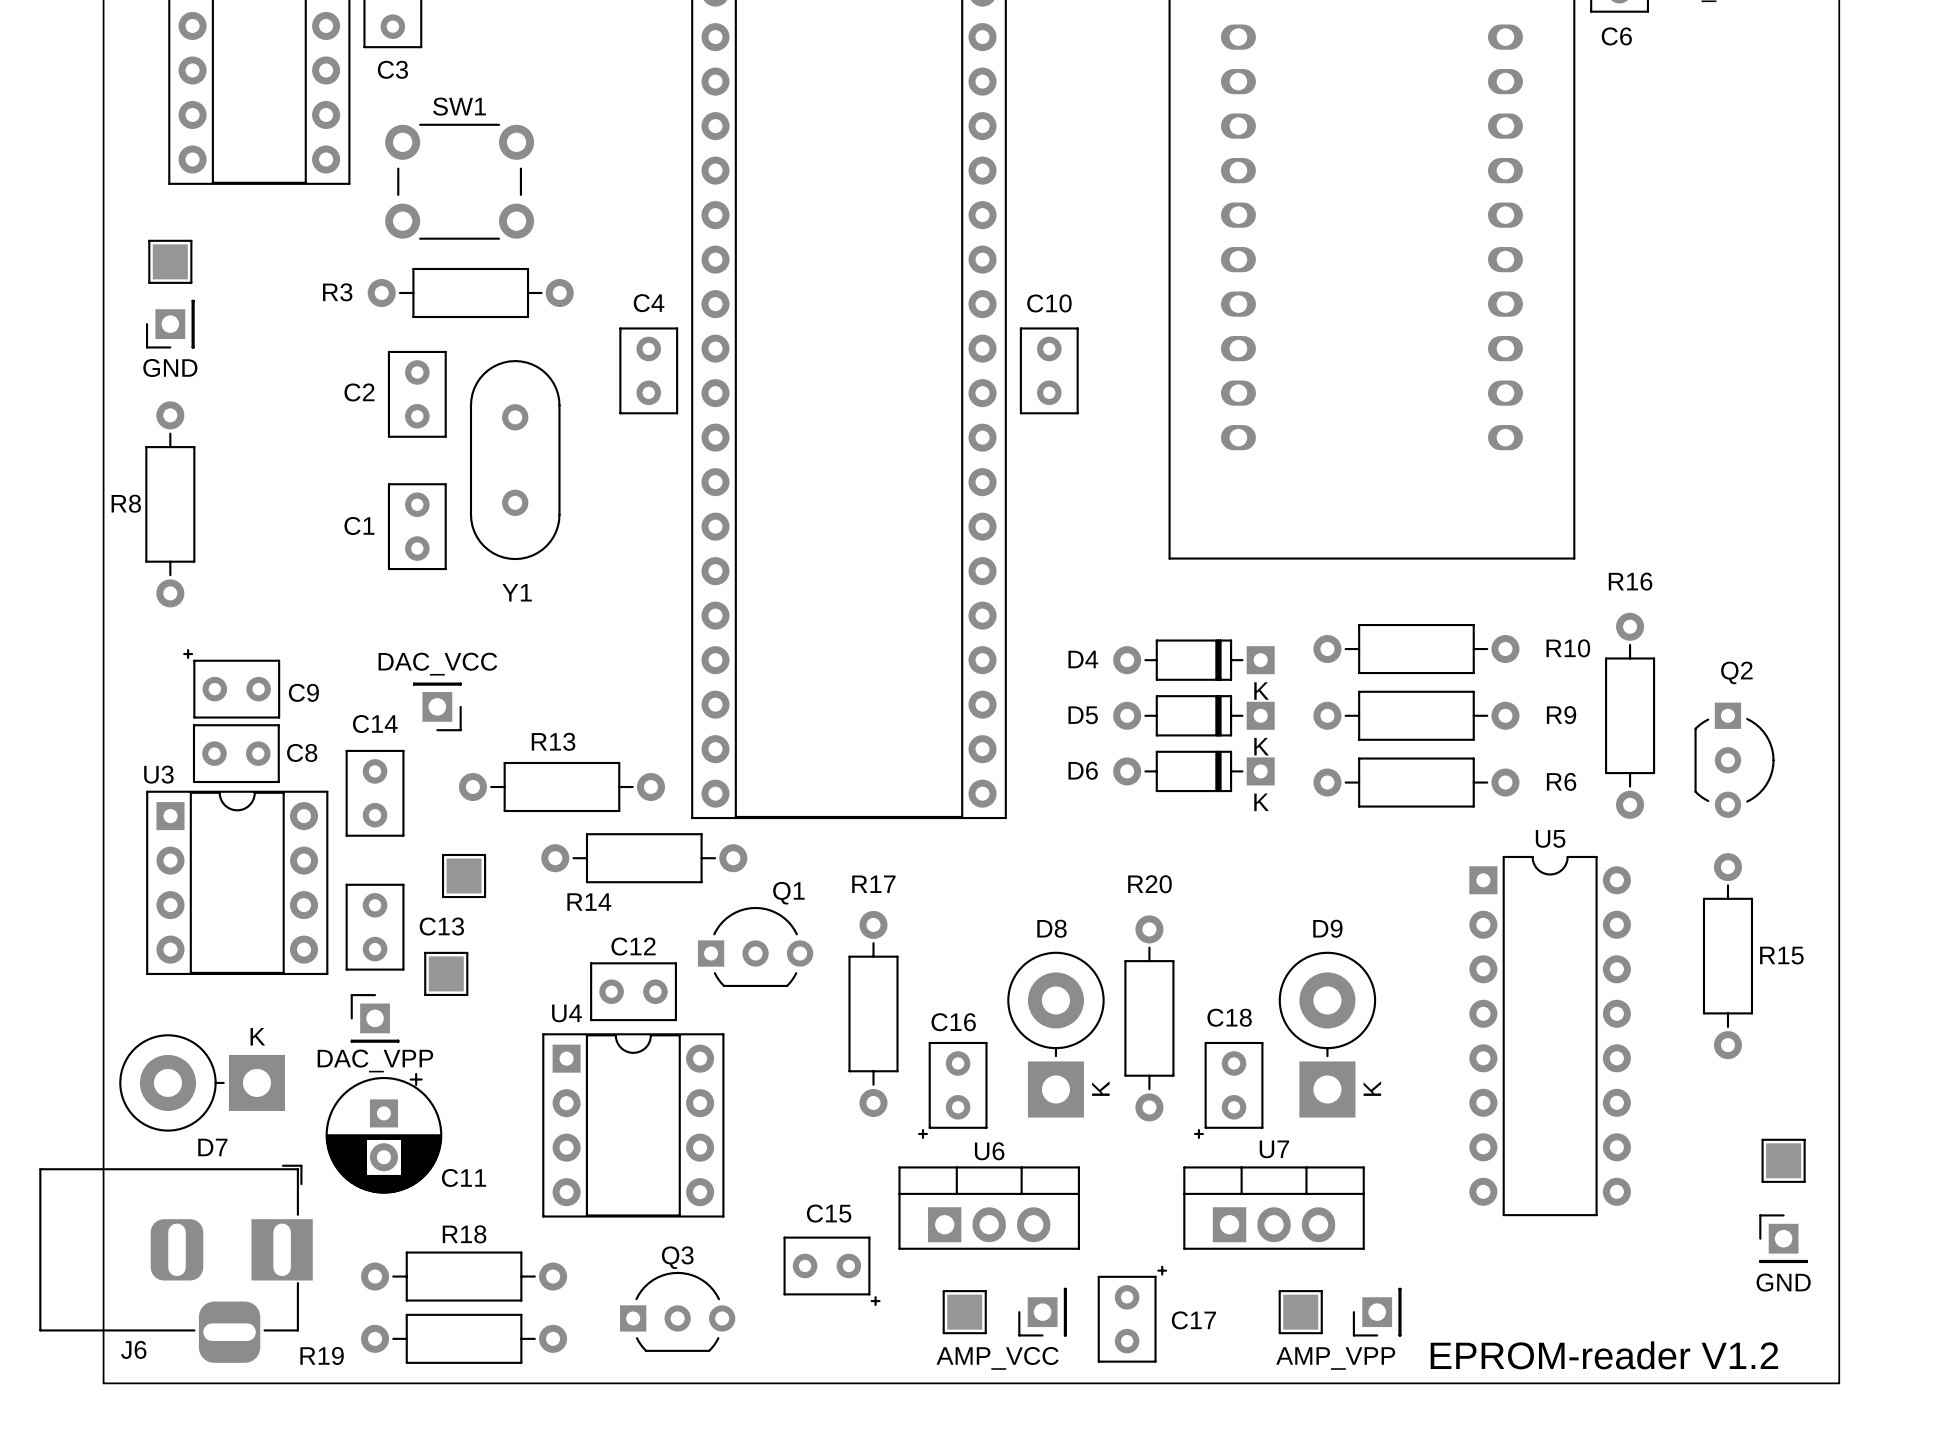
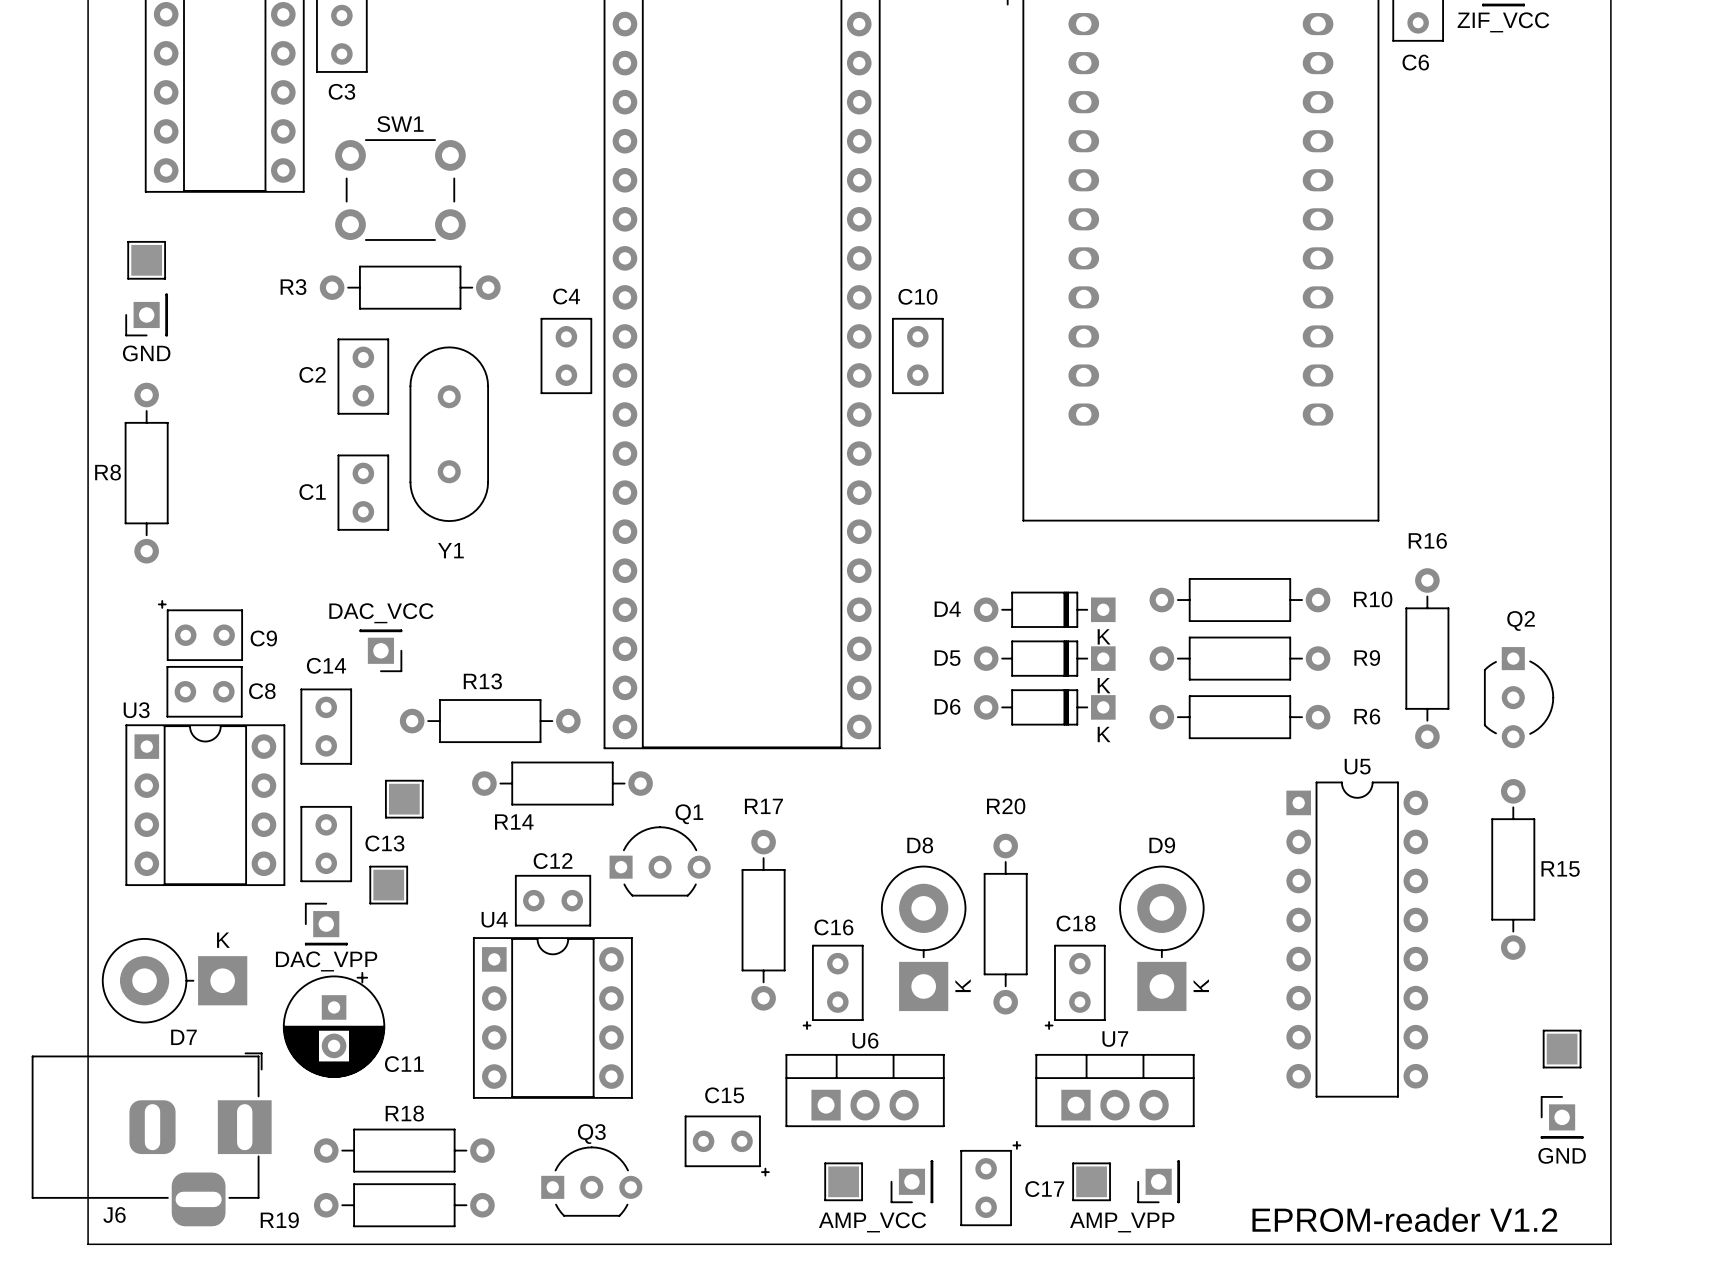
part position: (1300, 1312) -> (1091, 1181)
part position: (1377, 1312) -> (1158, 1181)

